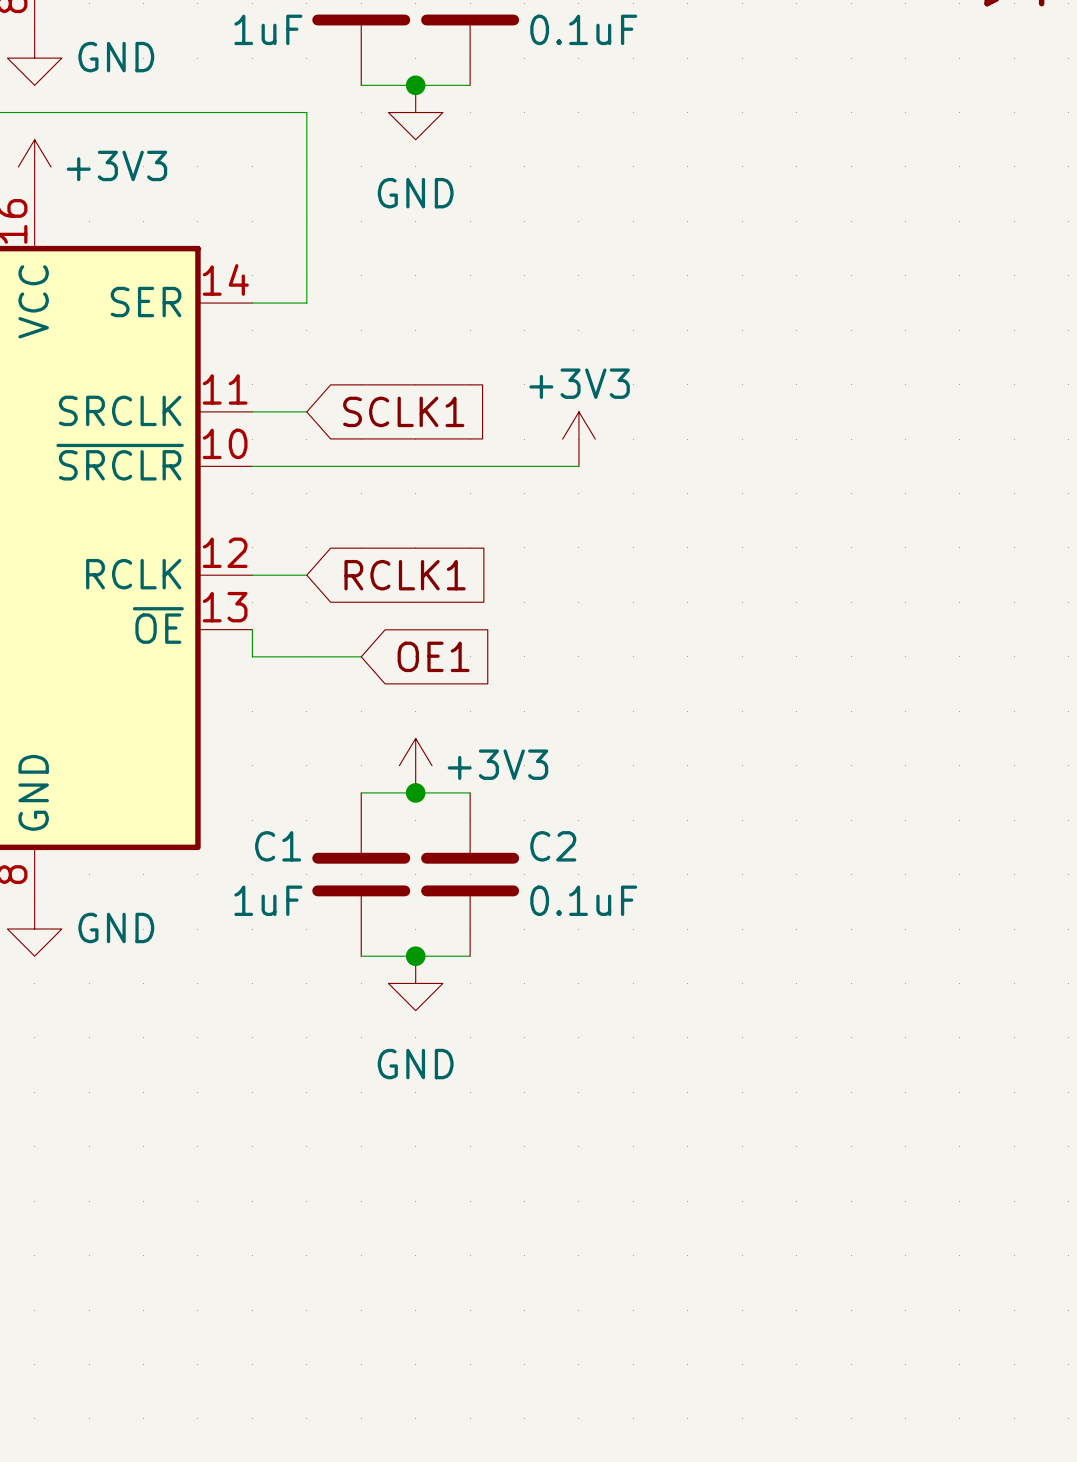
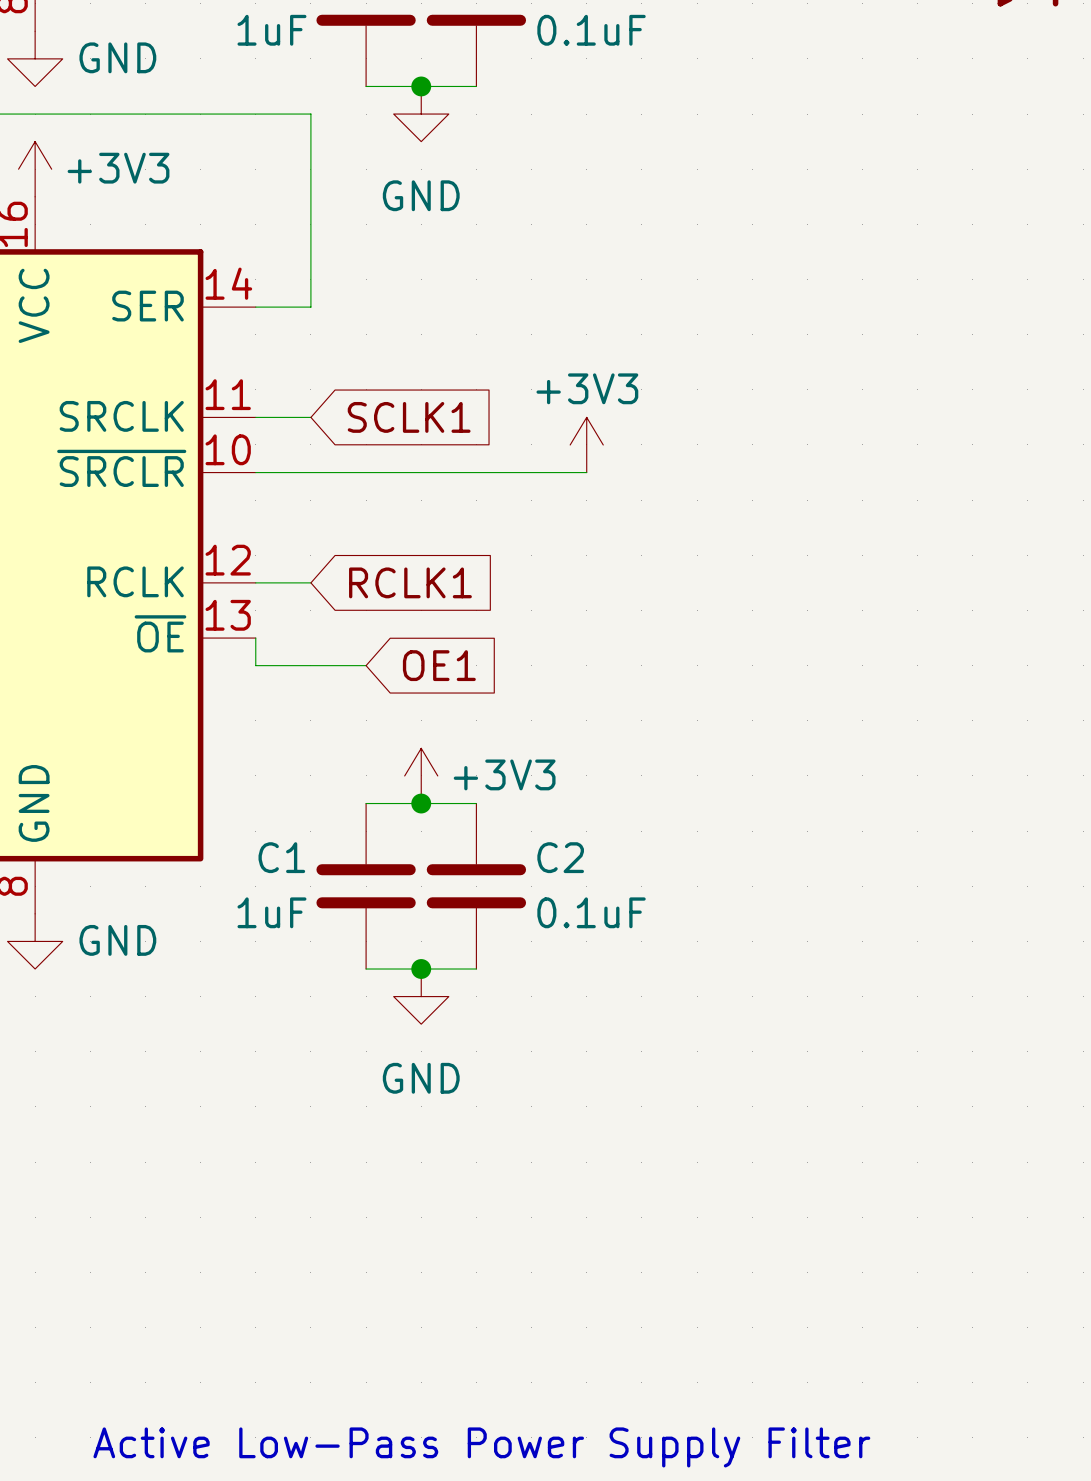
text: none -> Active Low-Pass Power Supply Filter (481, 1447)

